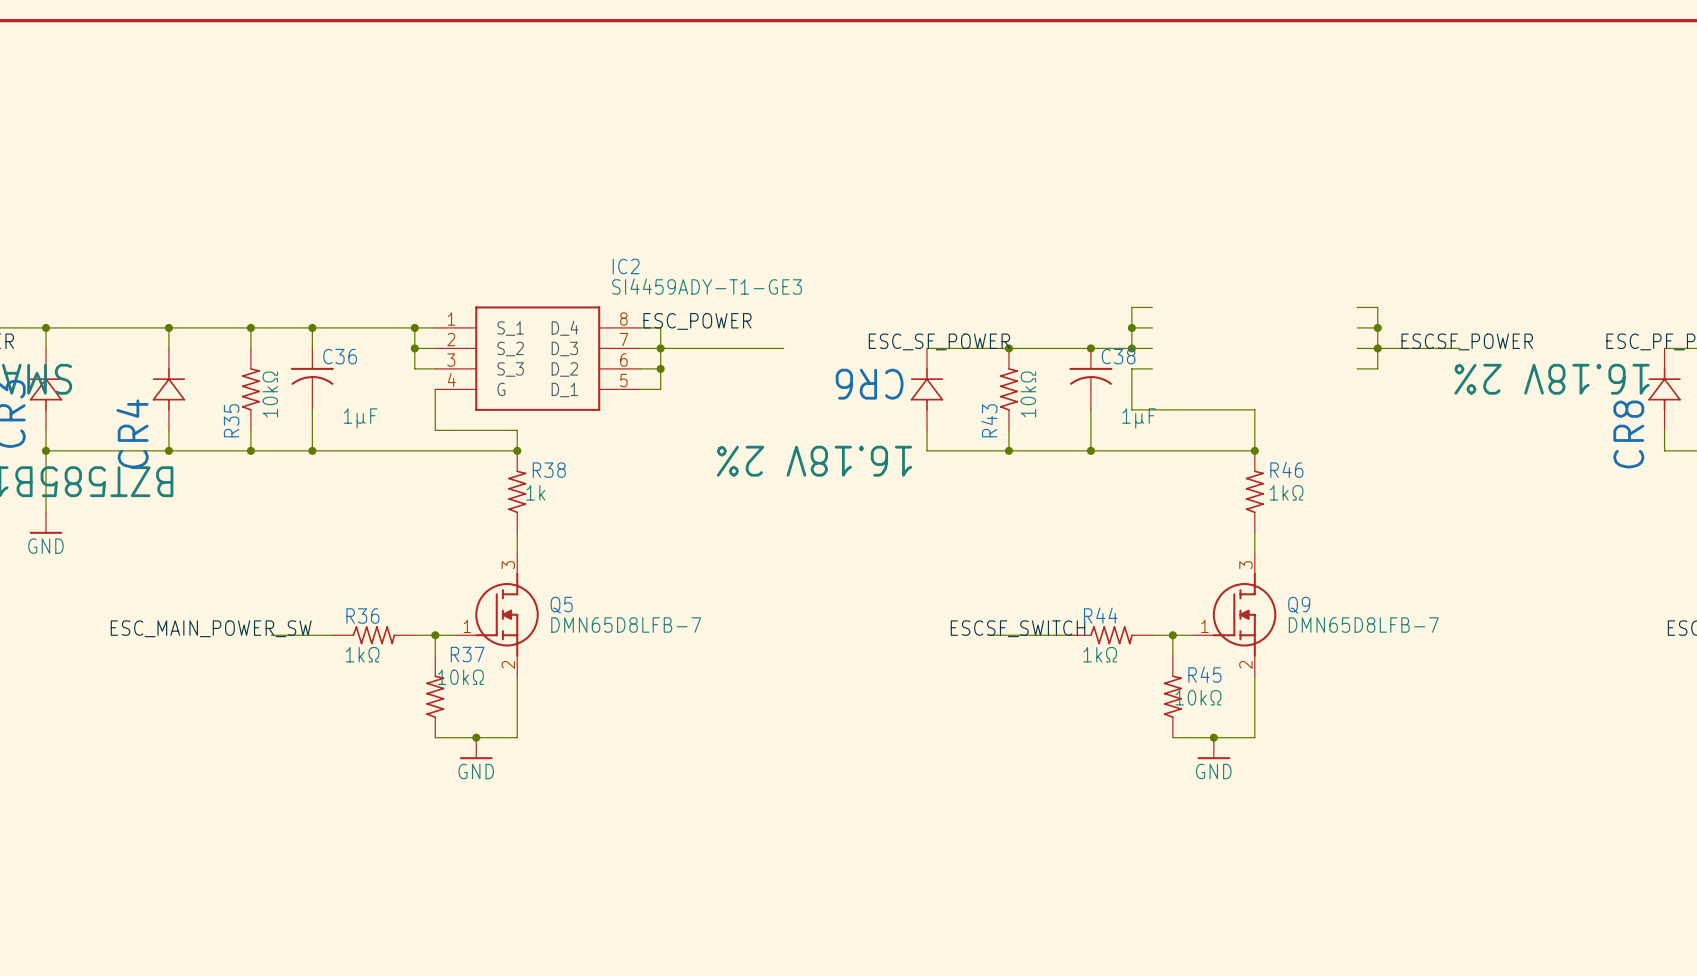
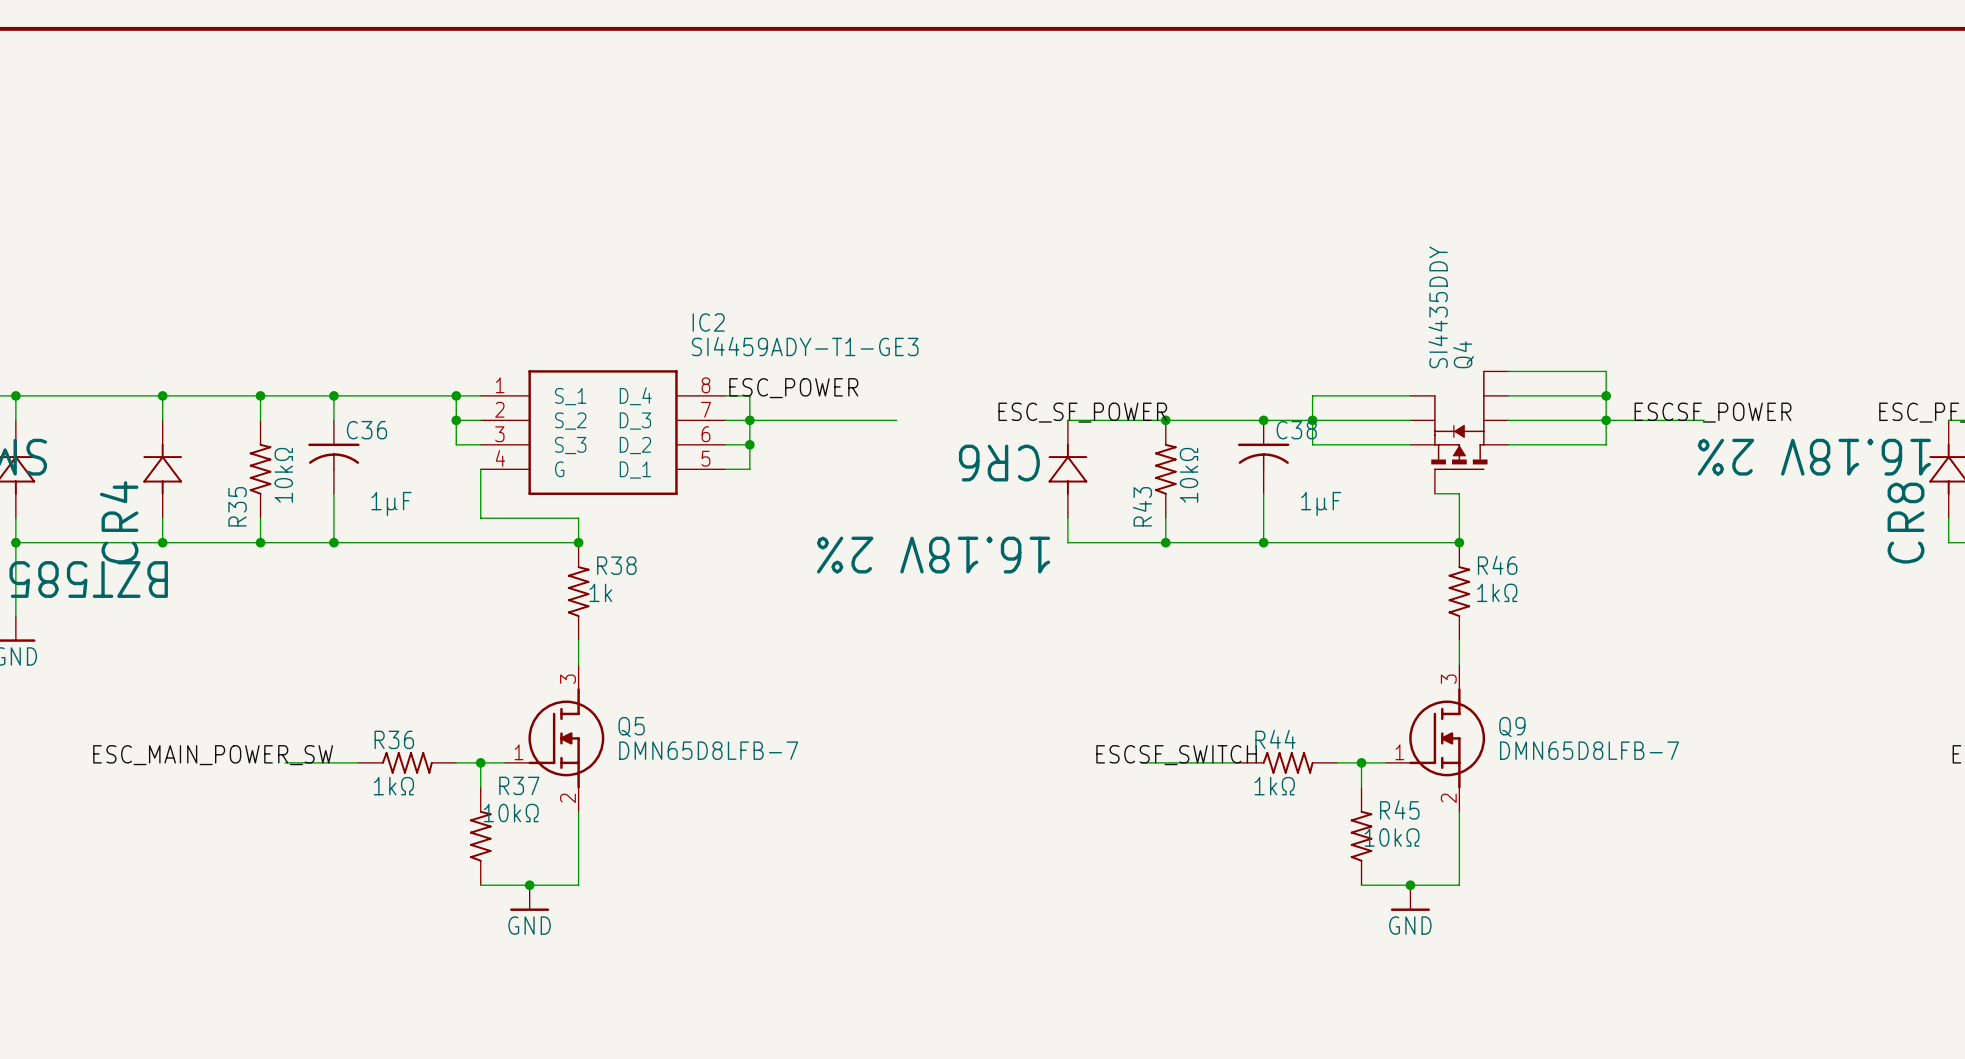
wire: (1152, 307) (1131, 307) (1131, 327) -> none
wire: none -> (1508, 371) (1581, 371)
junction: (1131, 327) -> none
wire: none -> (1337, 395) (1410, 395)
wire: none -> (1508, 395) (1581, 395)
wire: none -> (1337, 420) (1410, 420)
wire: none -> (1508, 420) (1581, 420)
Q4: none -> SI4435DDY (1459, 432)
wire: (1131, 368) (1131, 409) (1234, 409) -> (1312, 444) (1312, 420)
wire: none -> (1337, 444) (1410, 444)
wire: none -> (1508, 444) (1581, 444)

